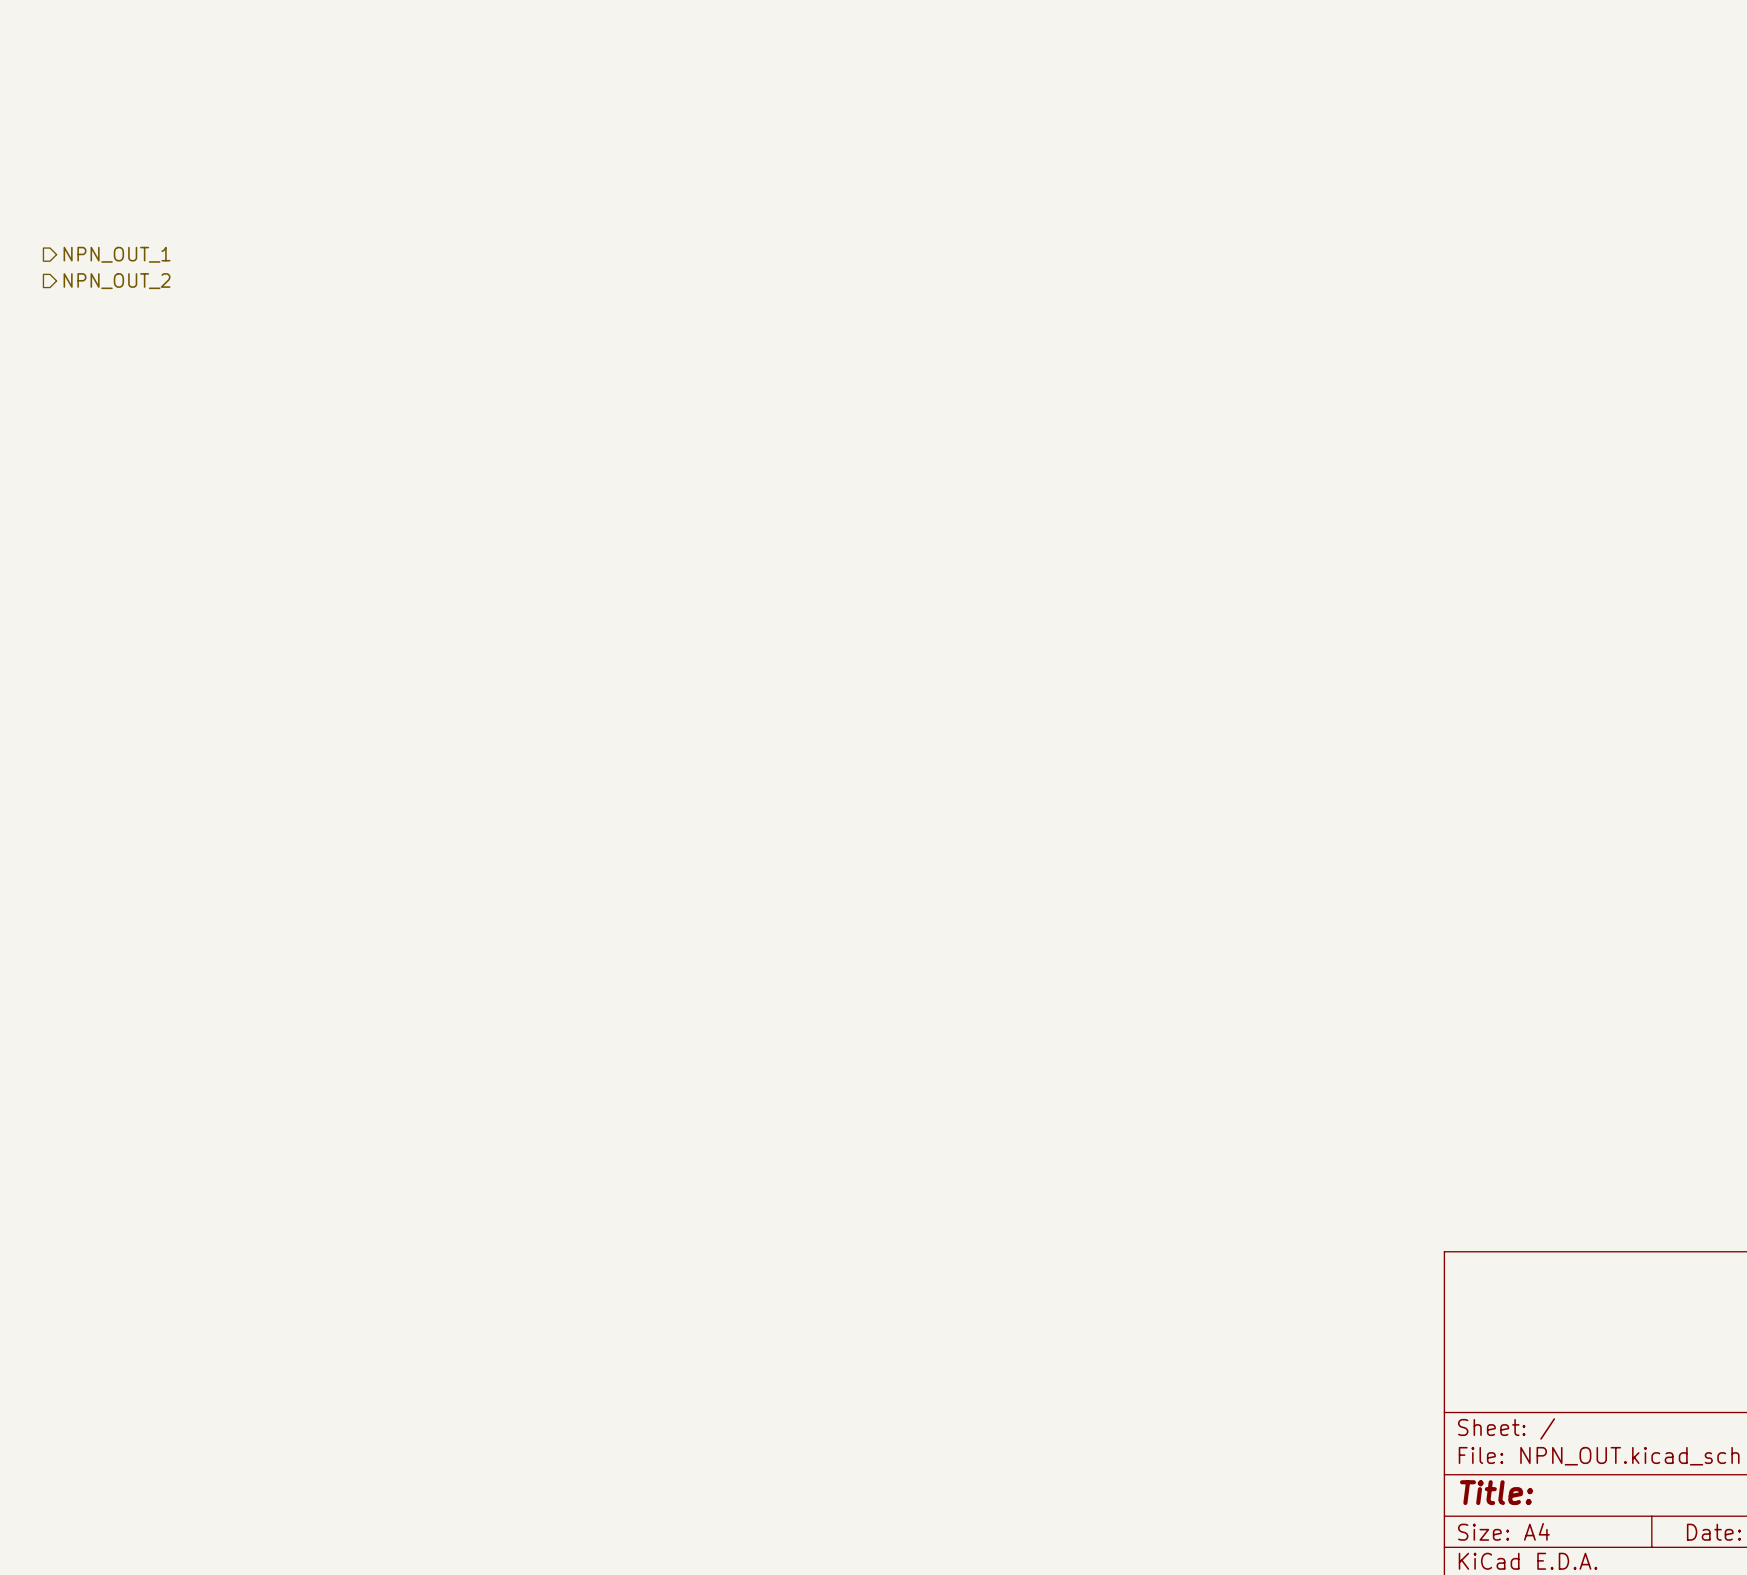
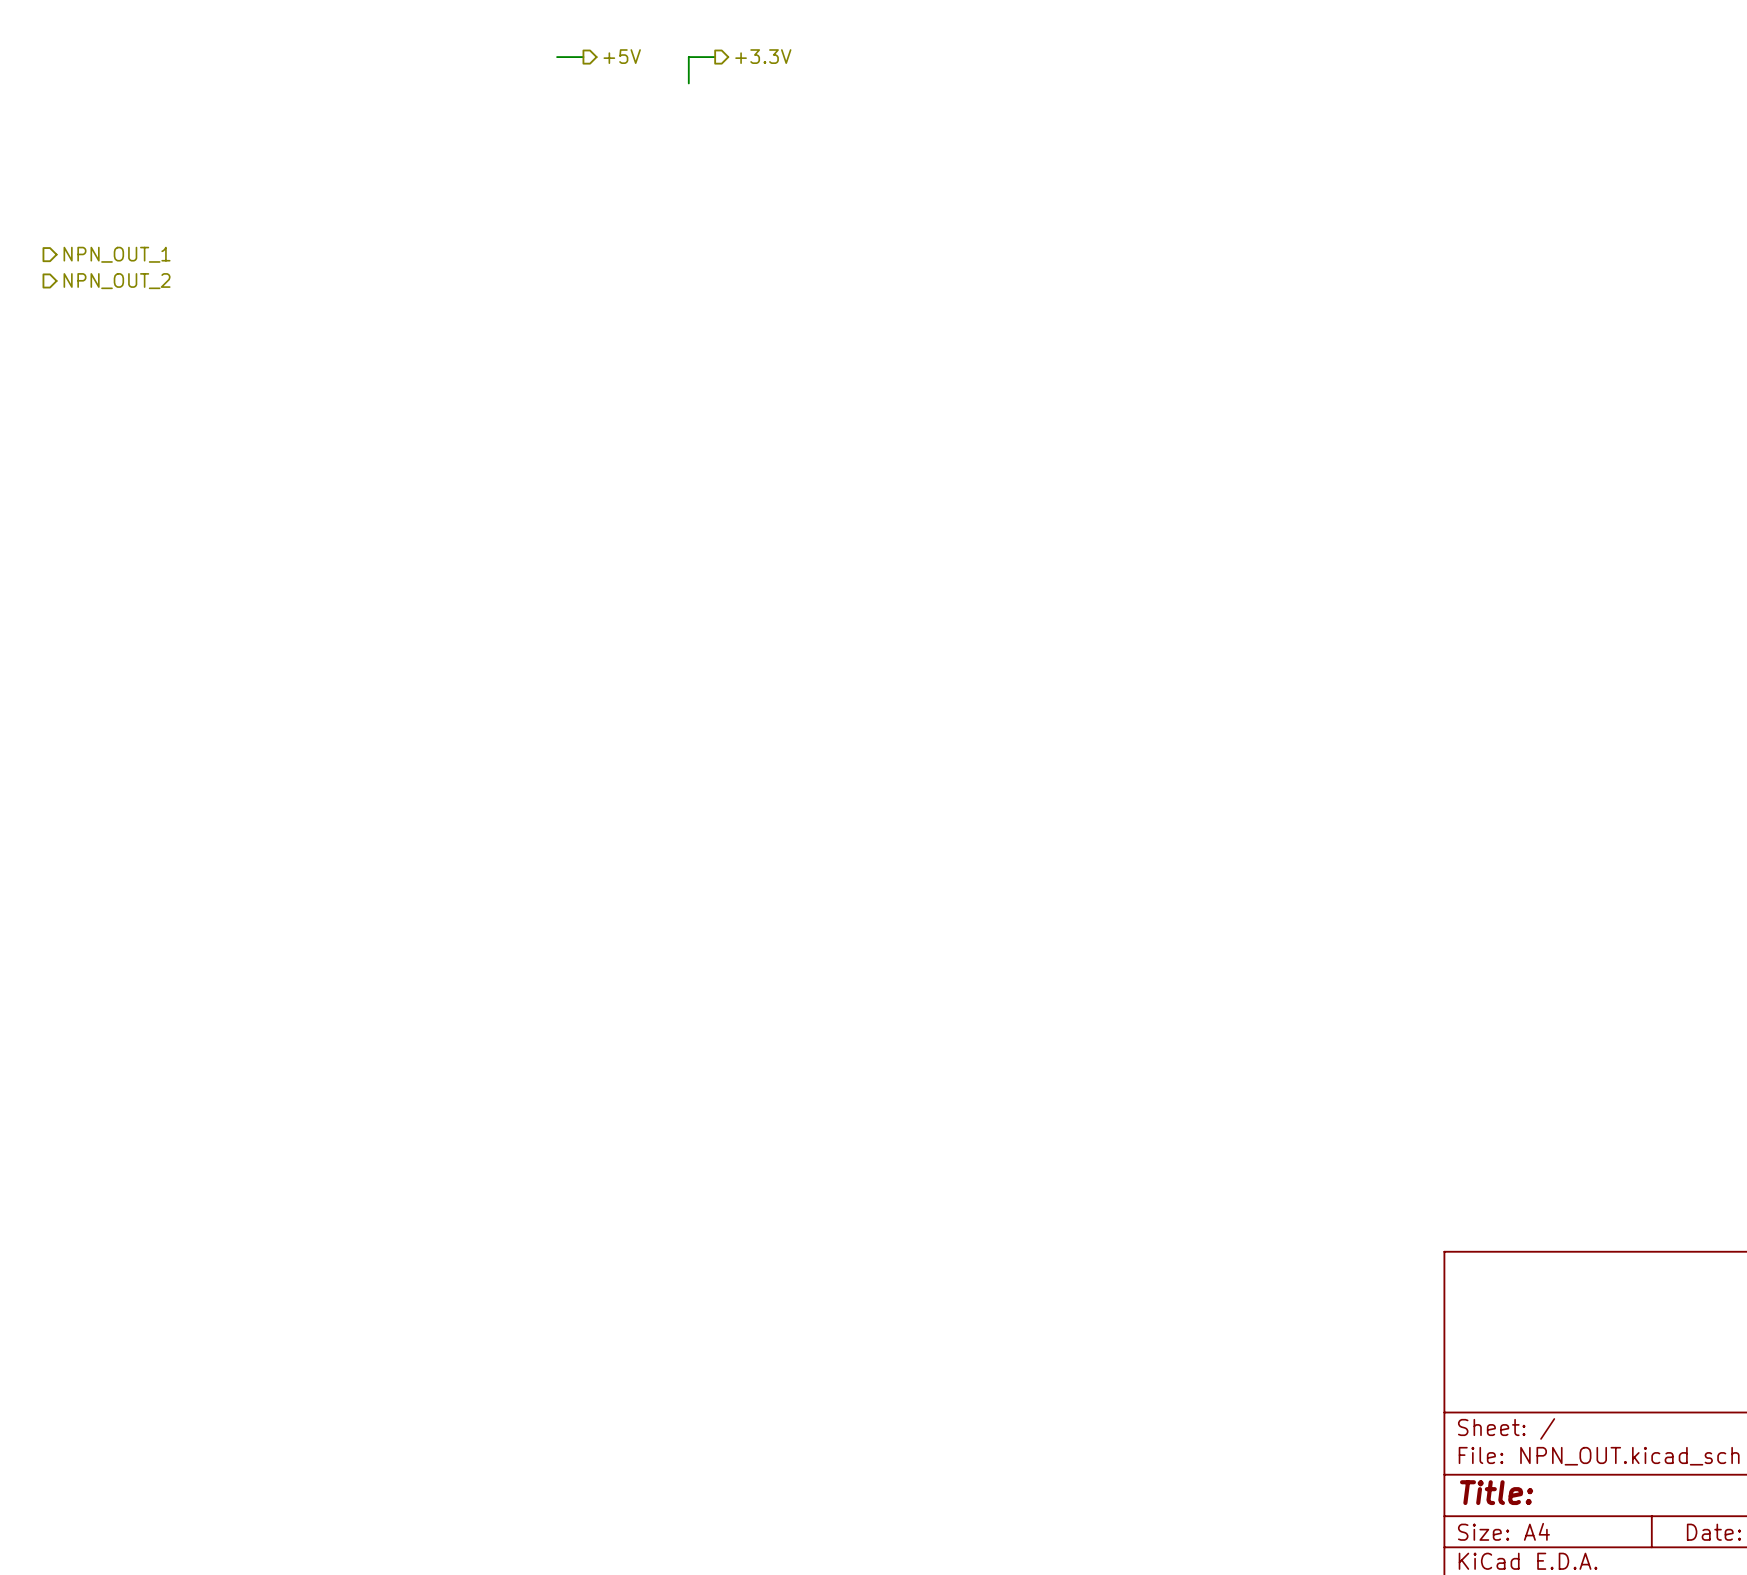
hierarchical label: none -> +5V (622, 56)
hierarchical label: none -> +3.3V (763, 56)
wire: none -> (557, 57) (583, 57)
wire: none -> (715, 57) (688, 57) (688, 83)

